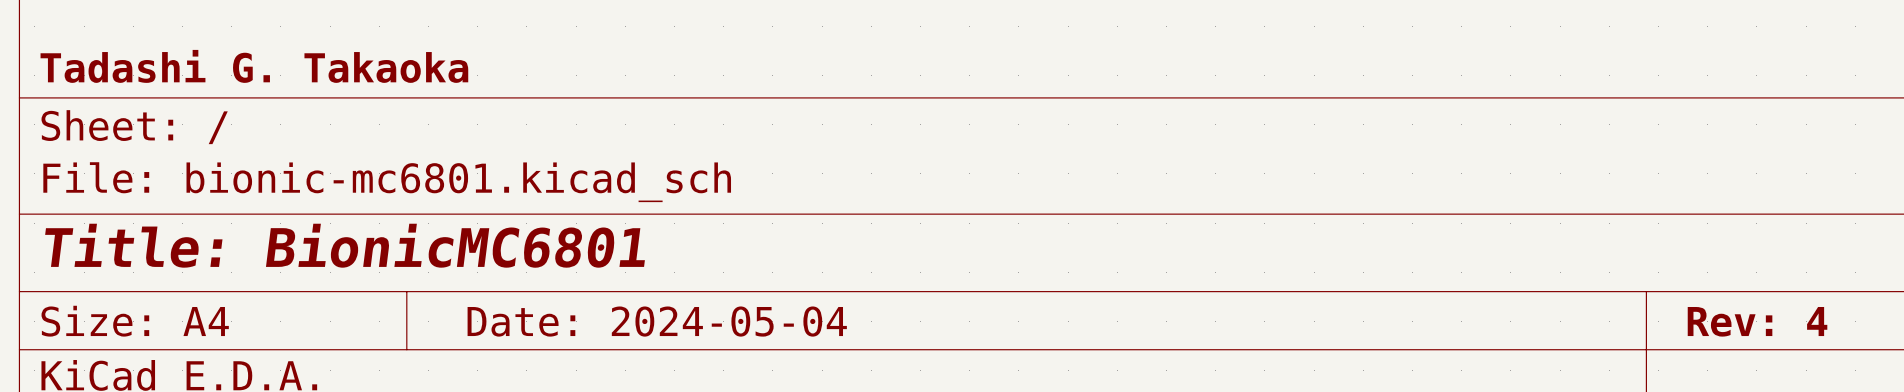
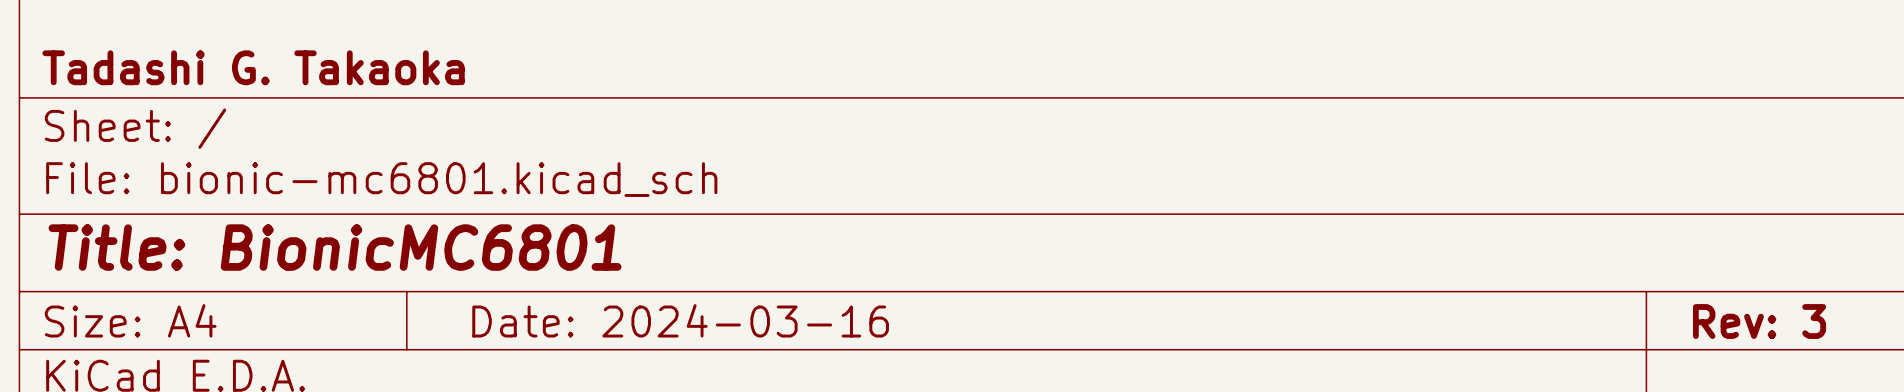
title block: Date: 2024-05-04 (657, 321) -> Date: 2024-03-16 (680, 320)
title block: Rev: 4 (1757, 321) -> Rev: 3 (1759, 321)

